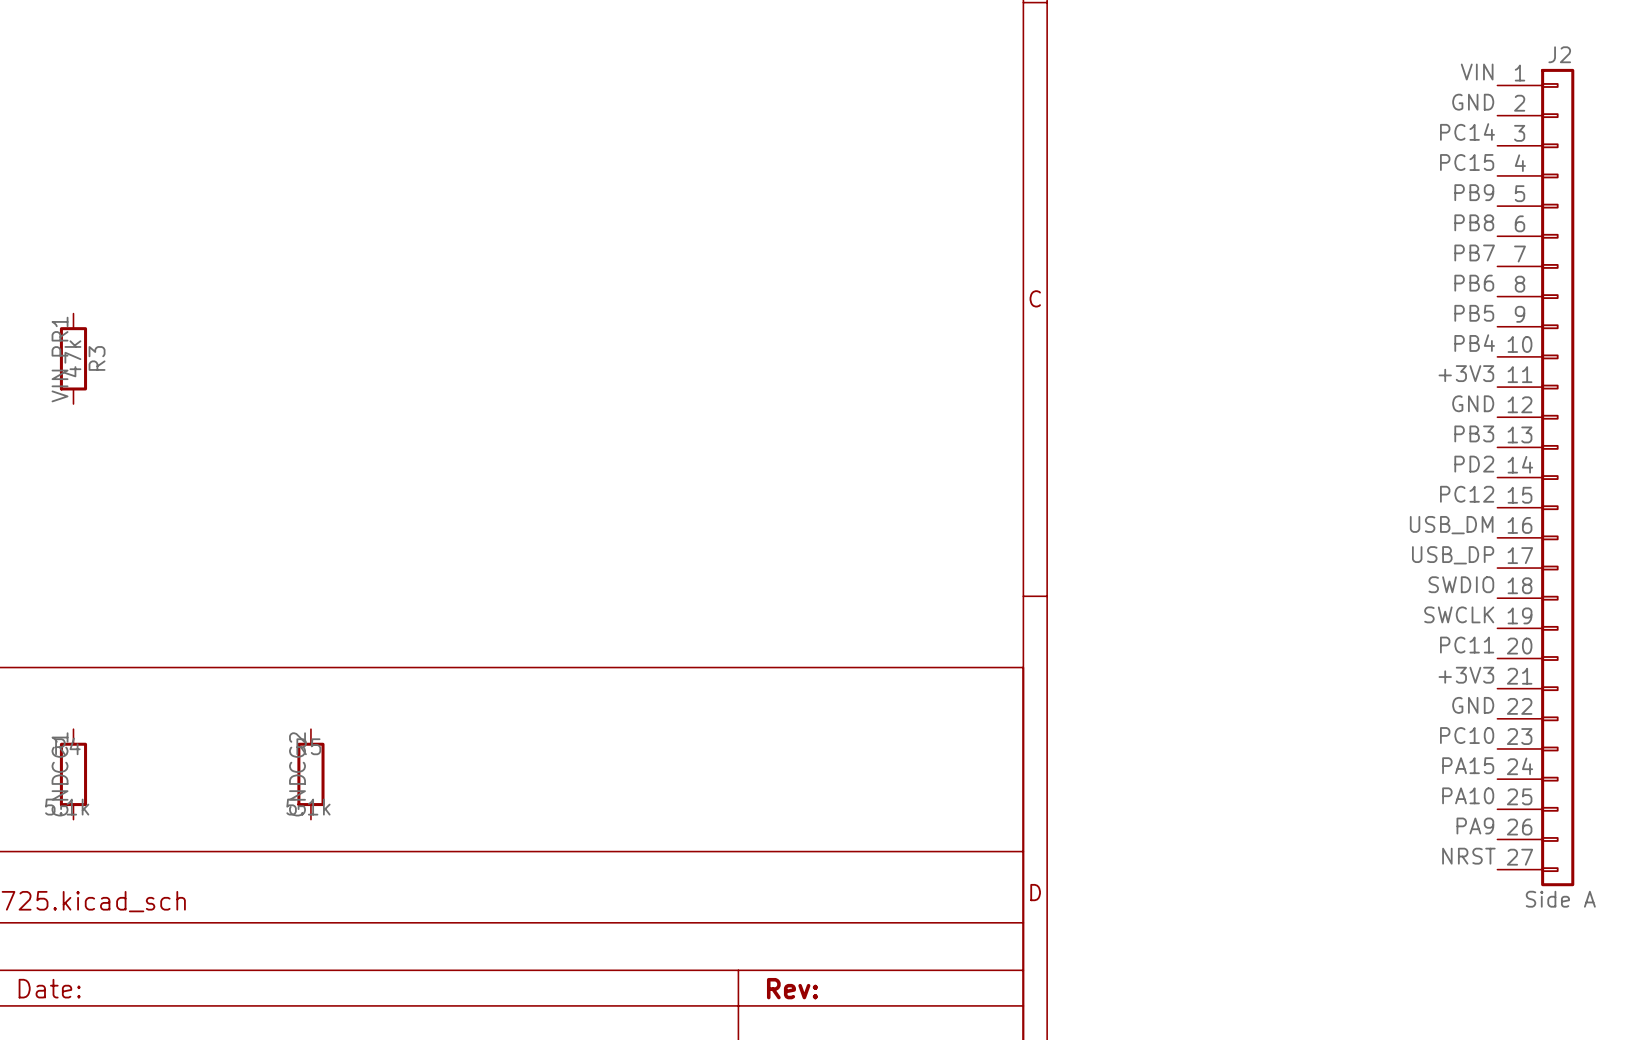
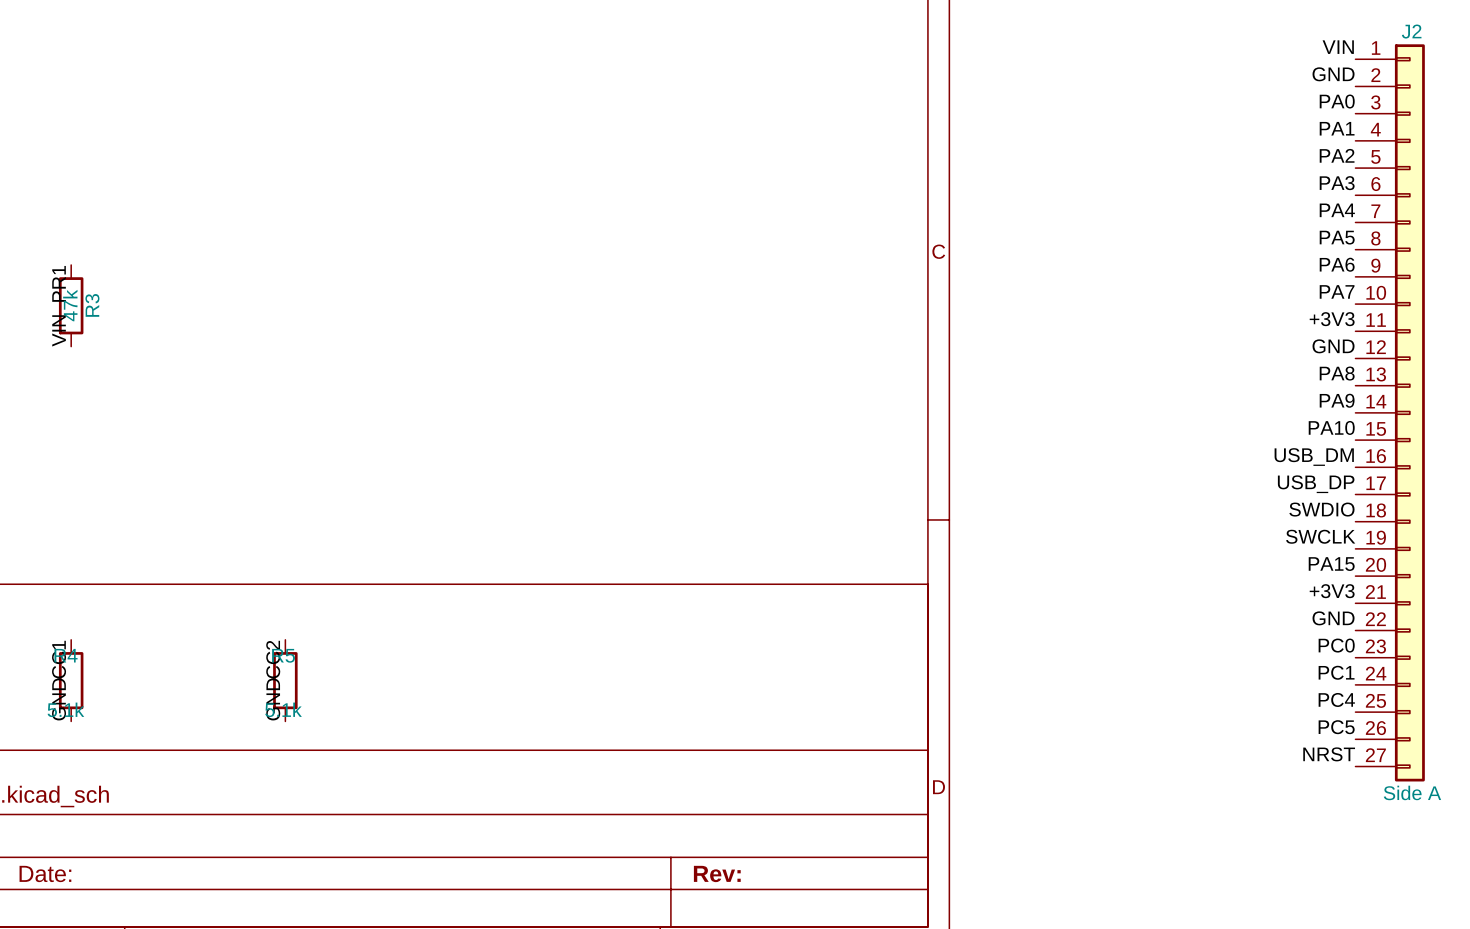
label: PC14 (1467, 131) -> PA0 (1337, 101)
label: PC15 (1467, 162) -> PA1 (1337, 128)
label: PB9 (1474, 192) -> PA2 (1337, 155)
label: PB8 (1474, 222) -> PA3 (1337, 183)
label: PB7 (1474, 252) -> PA4 (1337, 210)
label: PB6 (1474, 283) -> PA5 (1337, 237)
label: PB5 (1474, 313) -> PA6 (1337, 264)
label: PB4 (1474, 343) -> PA7 (1337, 291)
label: PB3 (1474, 433) -> PA8 (1337, 373)
label: PD2 (1474, 464) -> PA9 (1337, 400)
label: PC12 (1467, 494) -> PA10 (1331, 427)
label: PC11 (1467, 645) -> PA15 (1331, 564)
label: PC10 (1467, 735) -> PC0 (1336, 645)
label: PA15 (1468, 765) -> PC1 (1336, 672)
label: PA10 (1468, 795) -> PC4 (1336, 699)
label: PA9 (1475, 826) -> PC5 (1336, 727)

